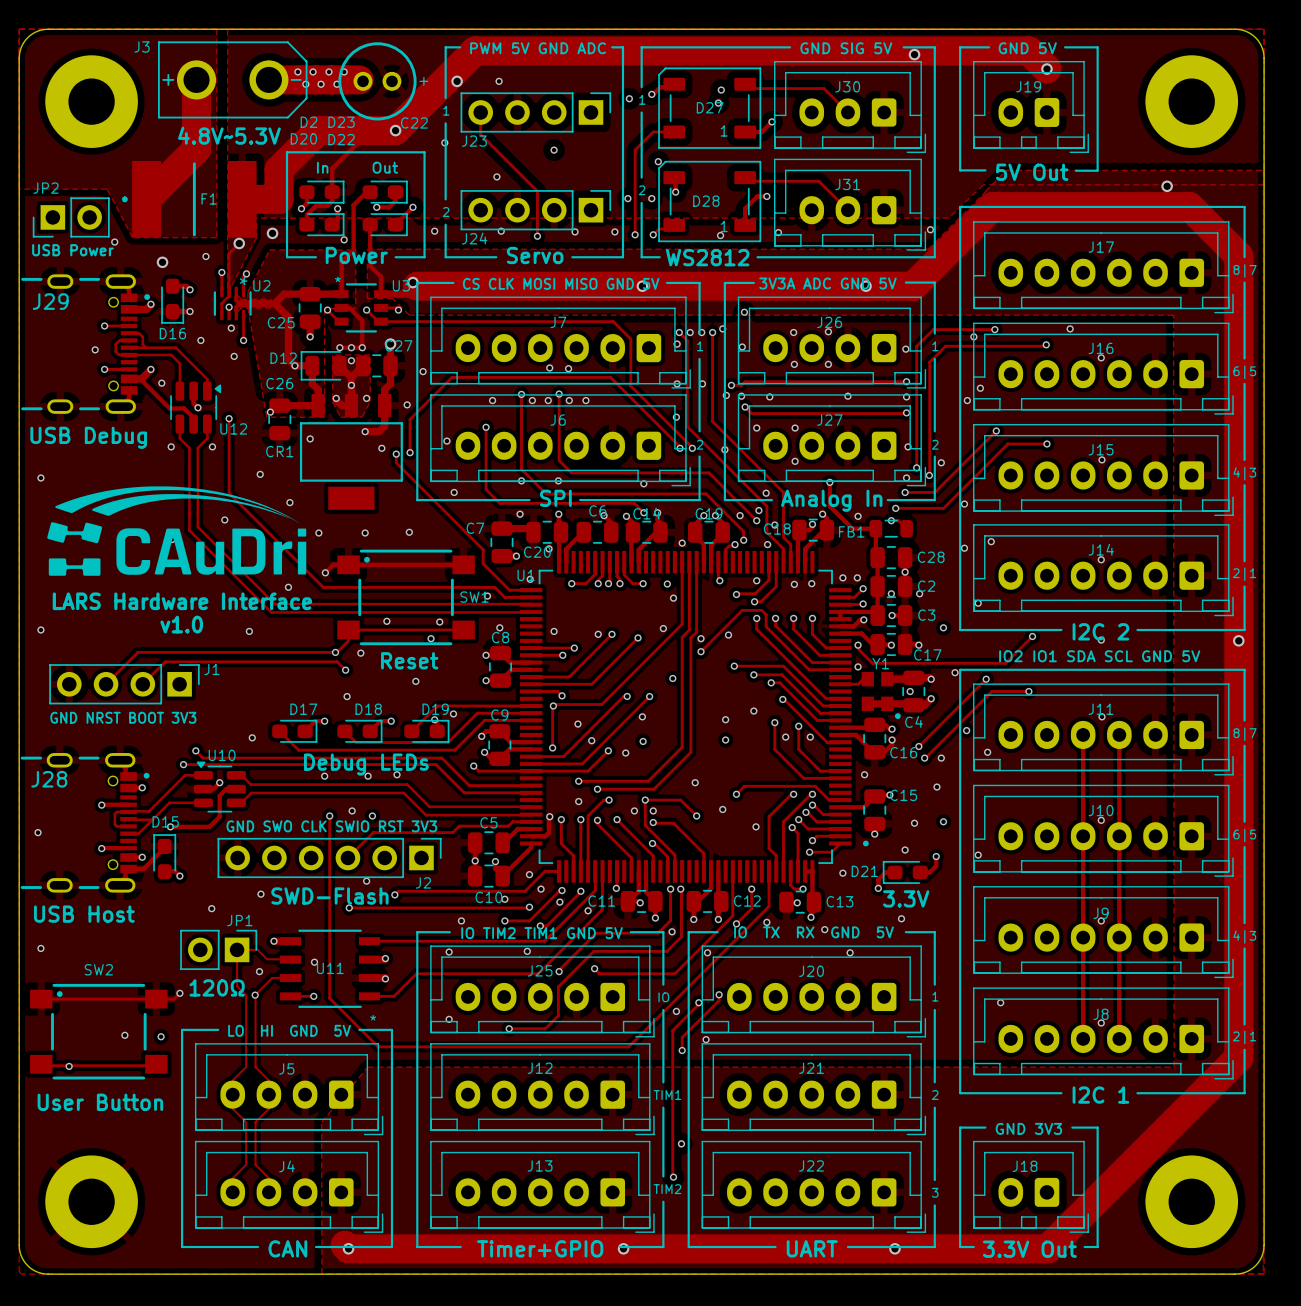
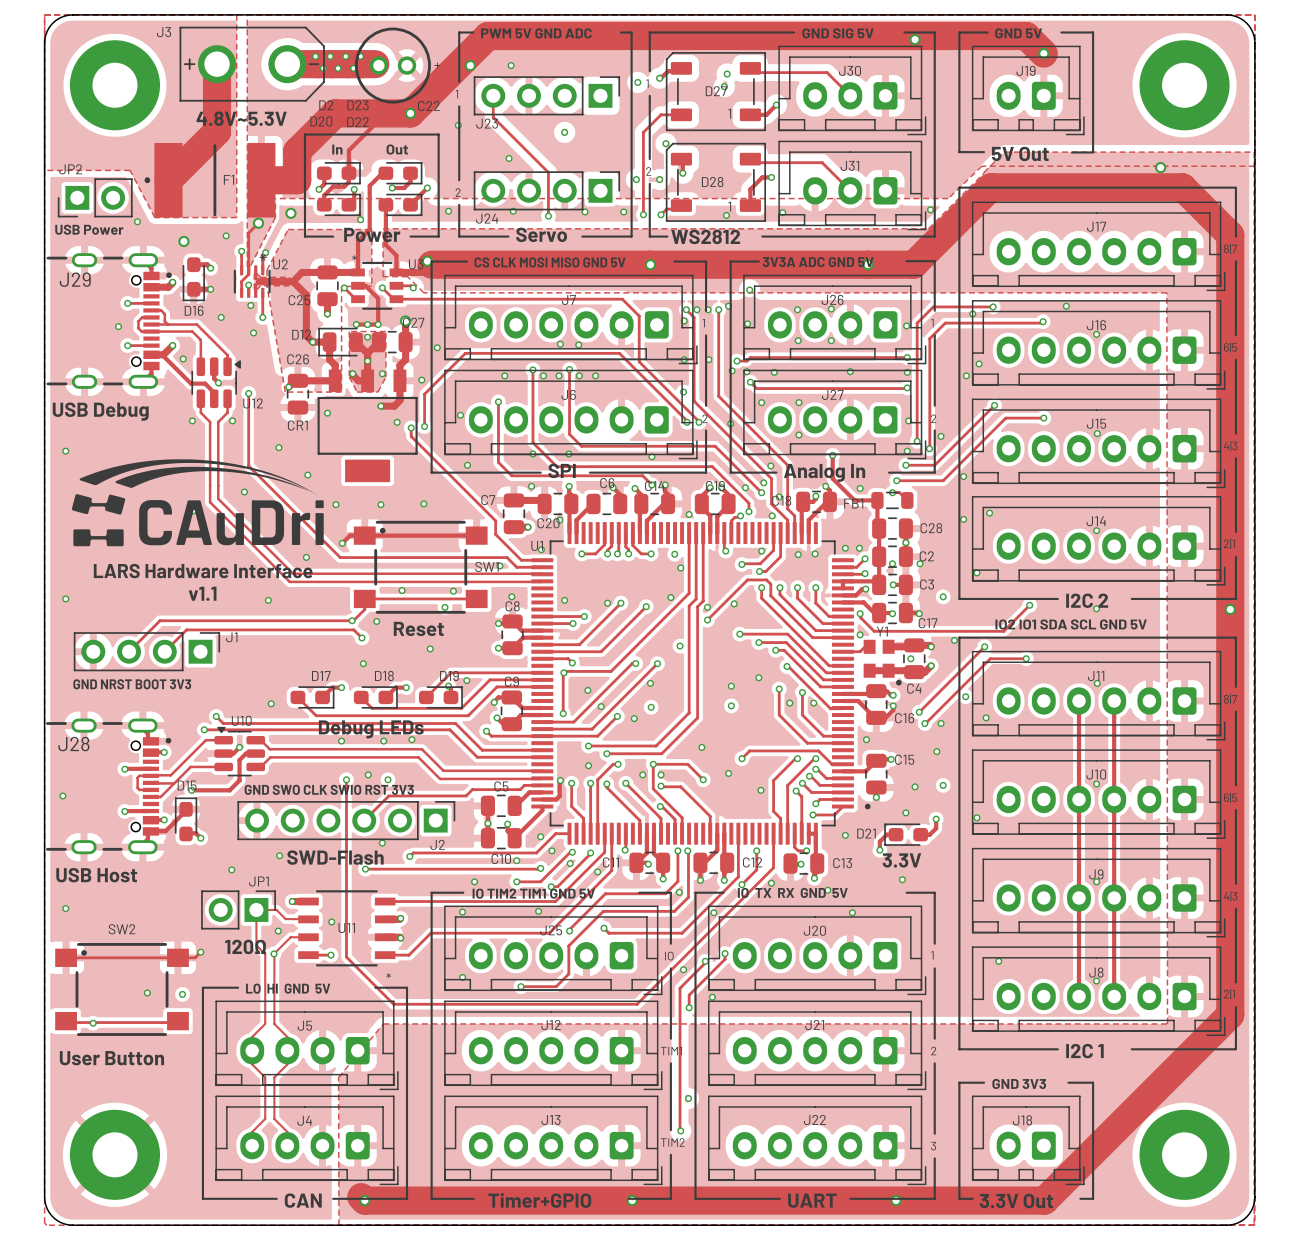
text: v1.0 (181, 624) -> v1.1 (202, 593)

